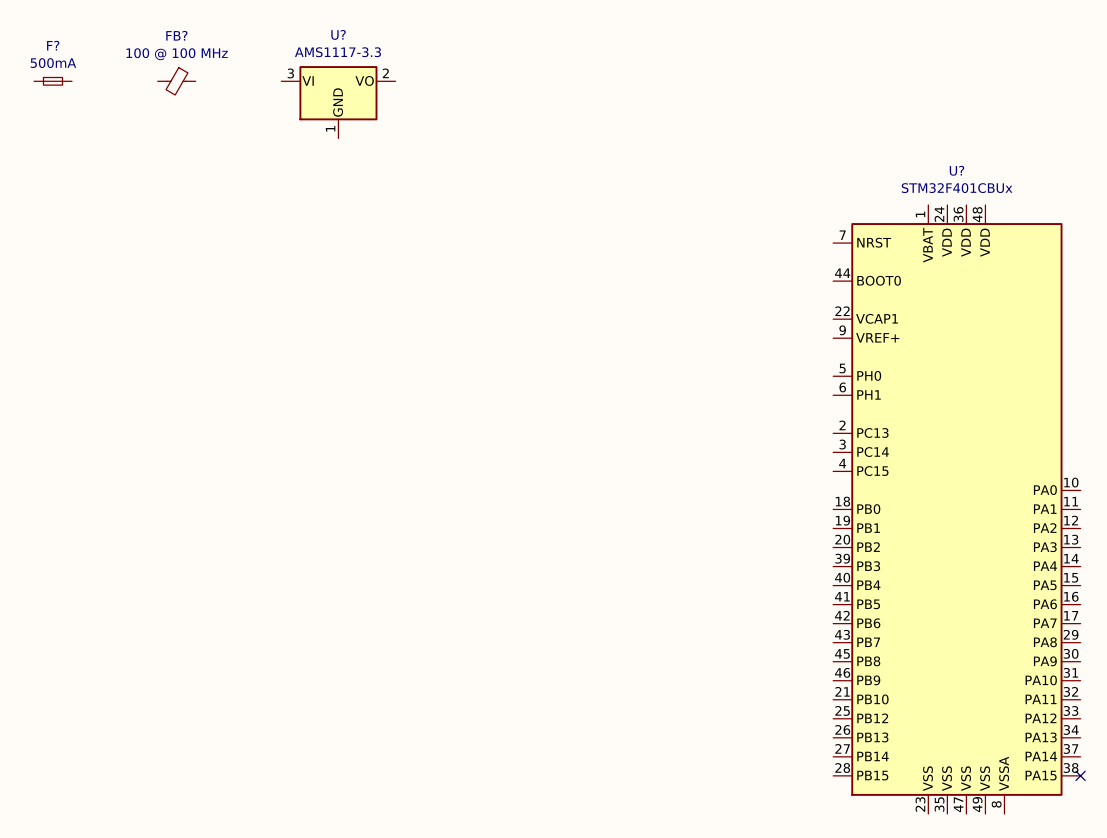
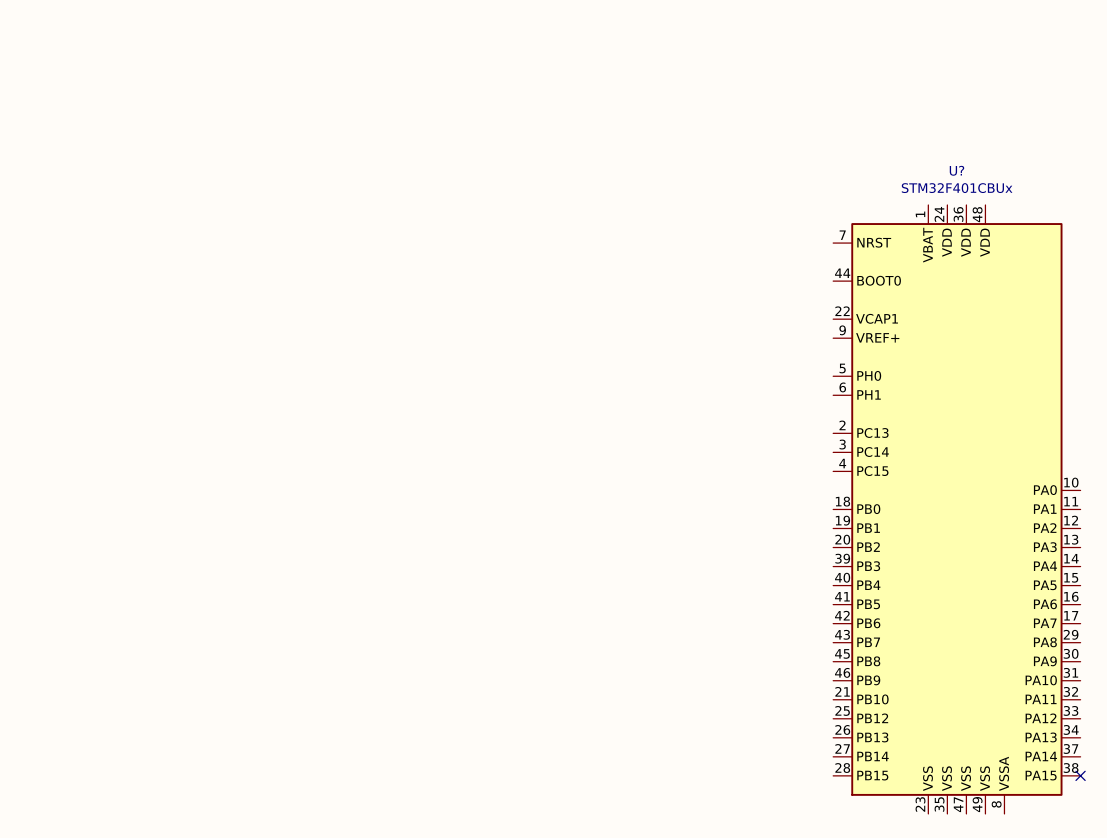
F?: 500mA (53, 81) -> none
FB?: 100 @ 100 MHz (176, 81) -> none
U?: AMS1117-3.3 (338, 102) -> none

